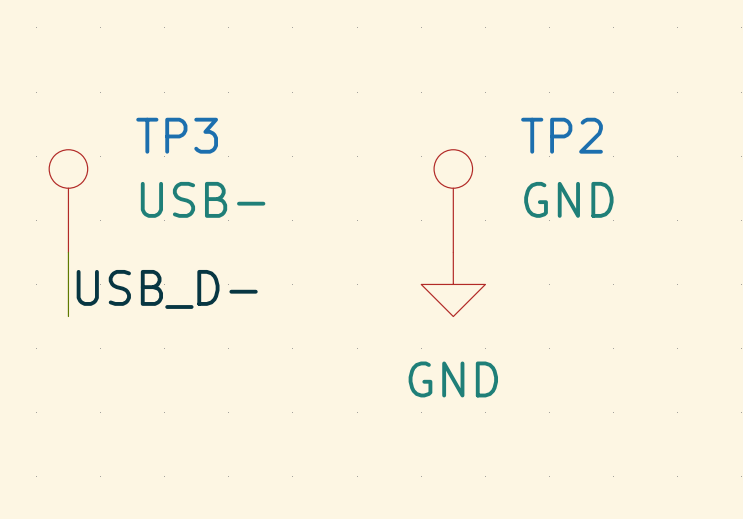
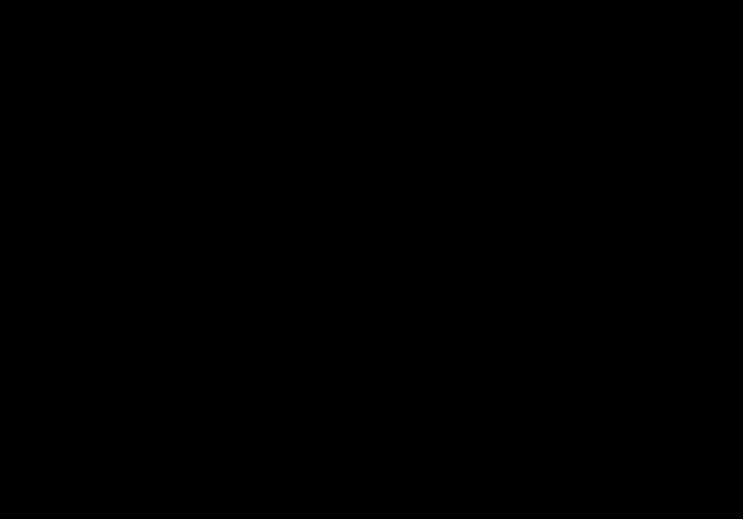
TP3: USB- (68, 201) -> none
TP2: GND (453, 201) -> none
wire: (68, 252) (68, 316) -> none
power symbol: GND (453, 284) -> none
label: USB_D- (167, 289) -> none

